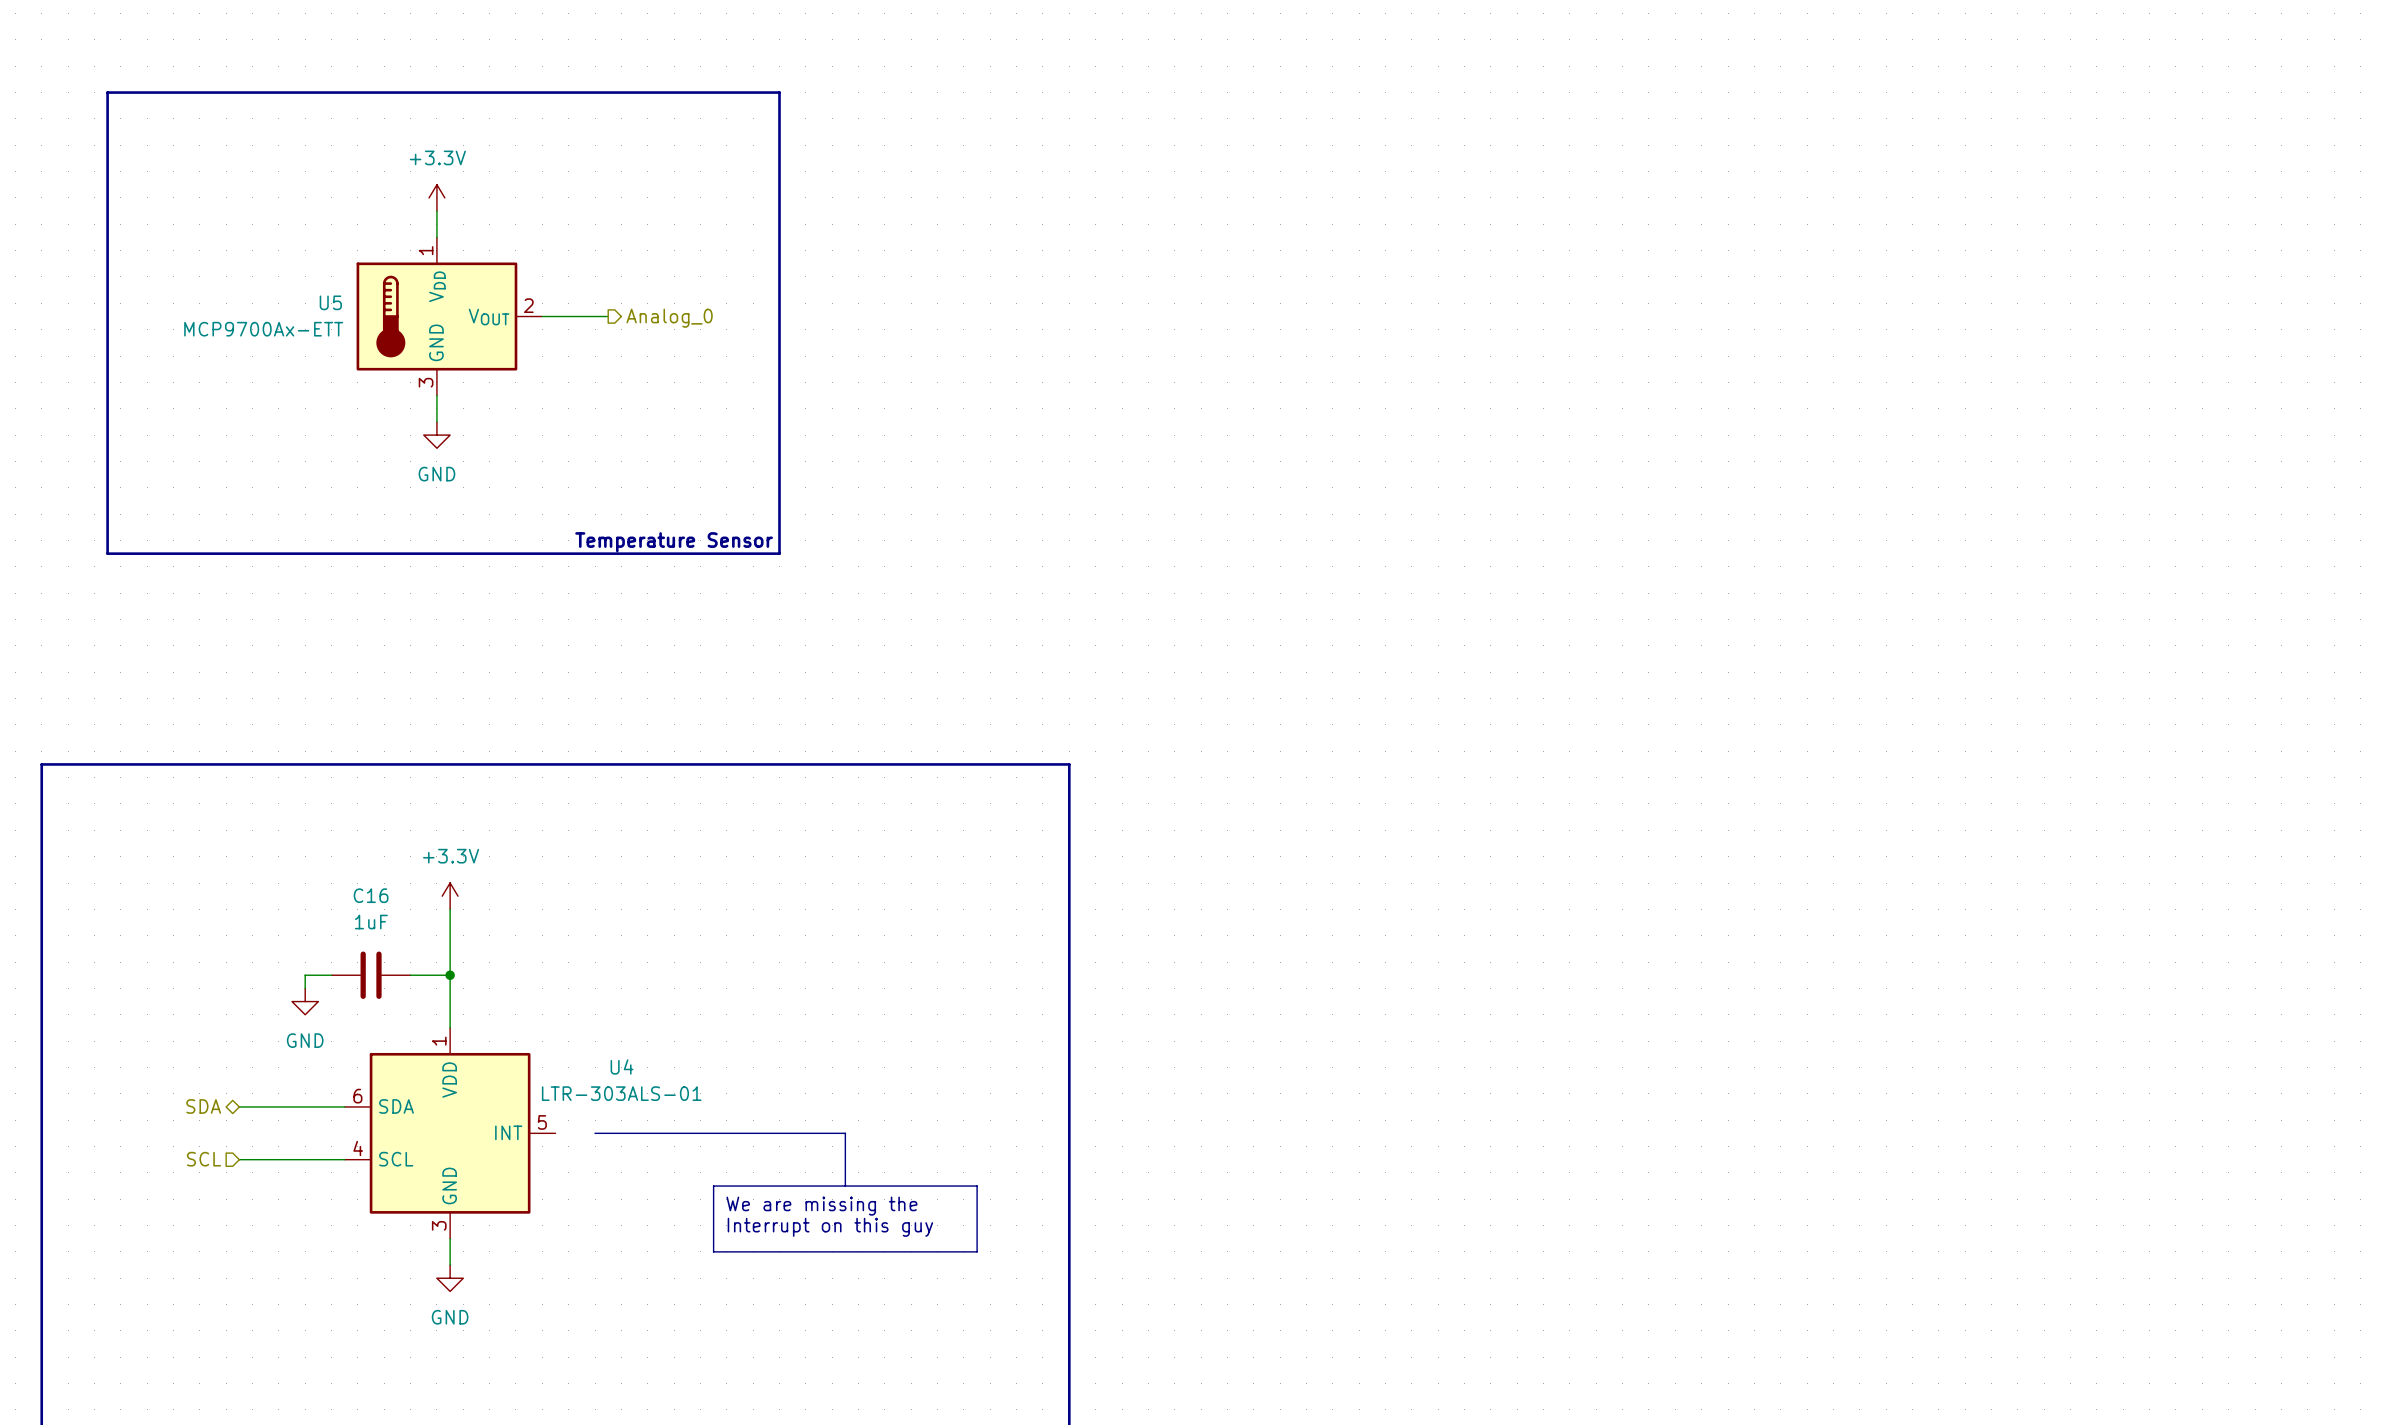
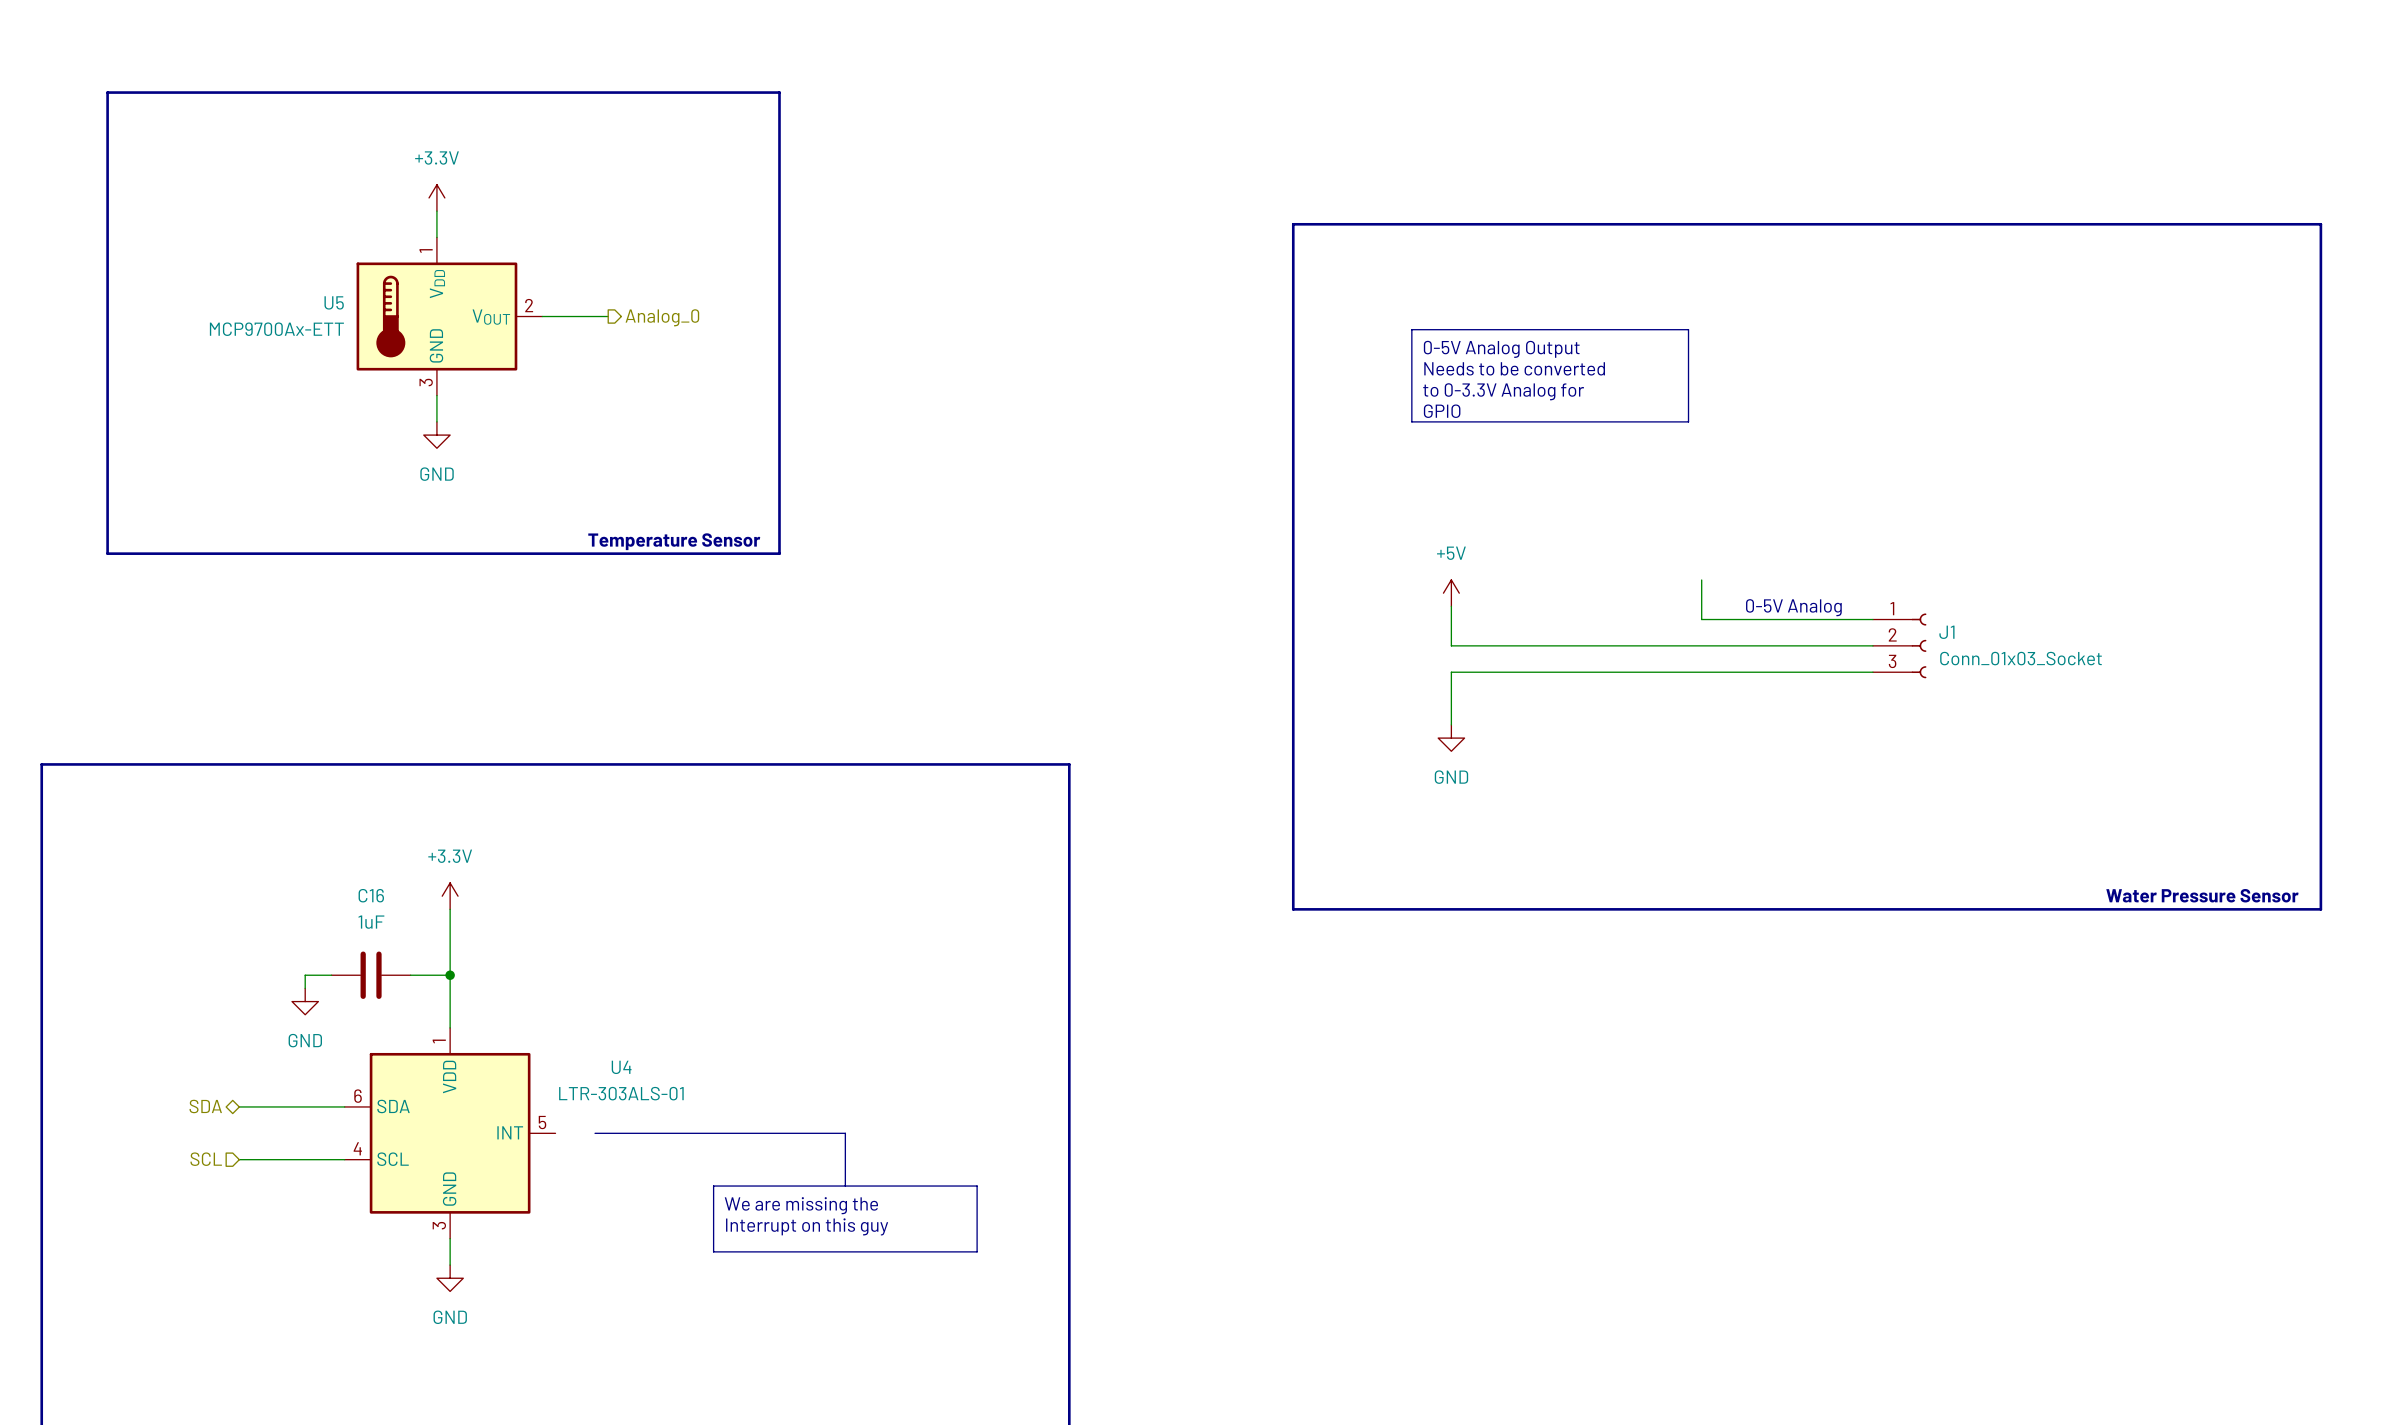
line: none -> (1293, 224) (2320, 224) (2320, 909) (1293, 909) (1293, 224)
line: none -> (1411, 329) (1688, 329) (1688, 421) (1411, 421) (1411, 329)
text: none -> 0-5V Analog Output (1501, 349)
text: none -> Needs to be converted (1514, 368)
text: none -> to 0-3.3V Analog for (1503, 391)
text: none -> GPIO (1442, 411)
wire: none -> (1701, 580) (1701, 619) (1872, 619)
power symbol: none -> +5V (1451, 593)
wire: none -> (1451, 606) (1451, 645) (1872, 645)
text: none -> 0-5V Analog (1793, 607)
J1: none -> Conn_01x03_Socket (1899, 645)
wire: none -> (1872, 672) (1451, 672) (1451, 724)
power symbol: none -> GND (1451, 738)
text: none -> Water Pressure Sensor (2202, 895)

